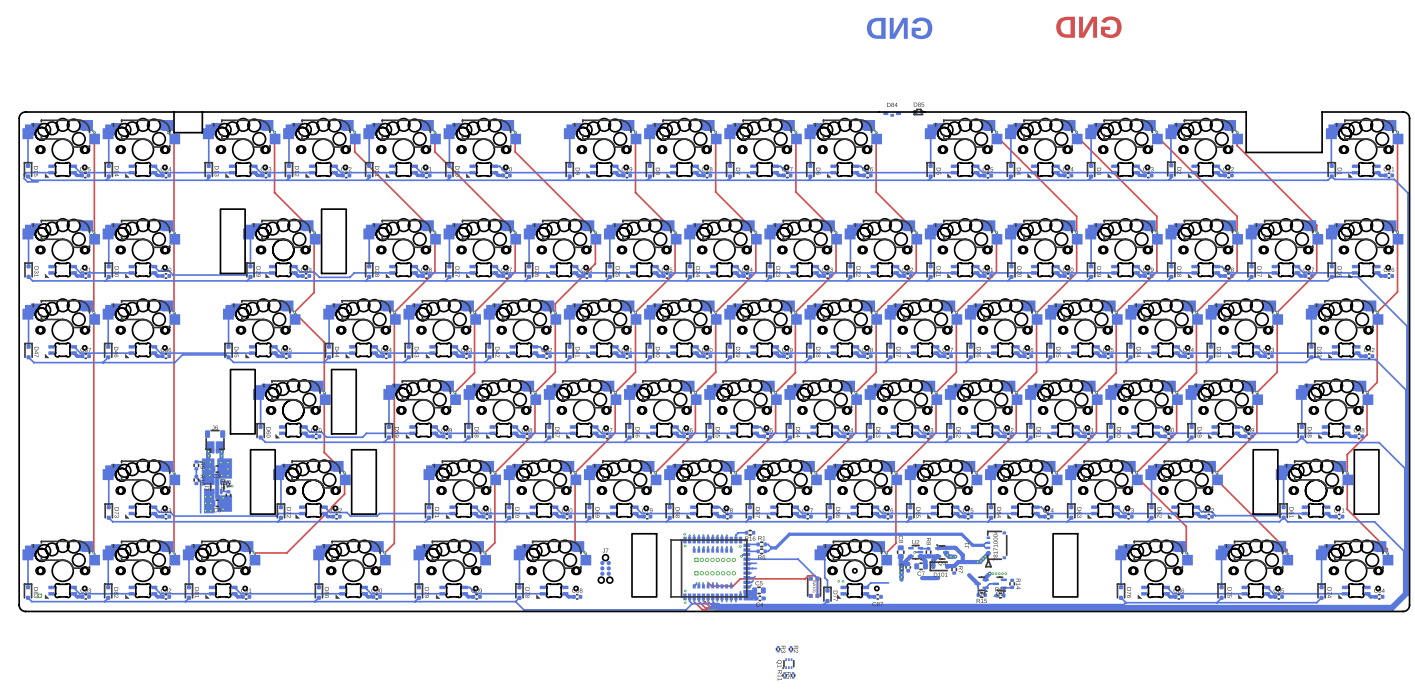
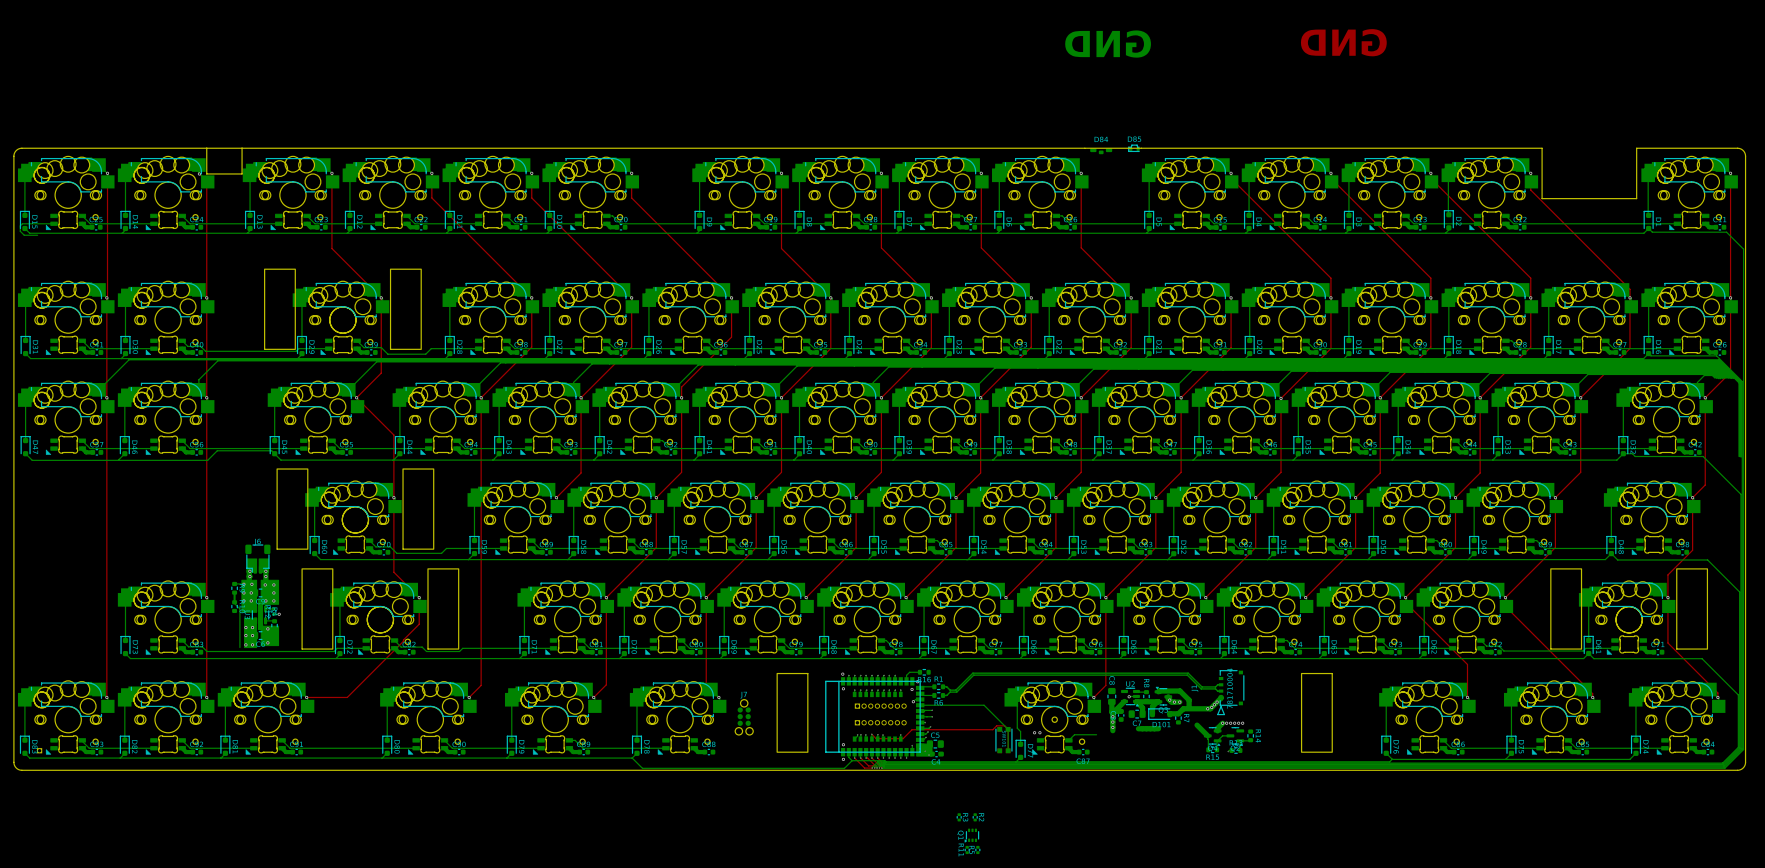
bottom track: (1331, 276) (1357, 276) (1406, 326) -> (1648, 353) (1650, 355) (1716, 355) (1742, 381) (1742, 414)
bottom track: none -> (1715, 378) (1712, 375) (1704, 375) (1697, 382) (1697, 389)
bottom track: none -> (1716, 378) (1712, 374) (1587, 374) (1572, 389)
bottom track: none -> (1721, 378) (1714, 371) (1291, 371) (1272, 389)
bottom track: none -> (1722, 378) (1714, 370) (1192, 370) (1172, 389)
bottom track: none -> (1723, 378) (1714, 369) (1093, 369) (1073, 389)
bottom track: none -> (1725, 378) (1715, 368) (994, 368) (973, 389)
bottom track: none -> (1726, 378) (1715, 367) (888, 367) (873, 382) (873, 389)
bottom track: none -> (1728, 378) (1716, 366) (797, 366) (773, 389)
bottom track: none -> (1730, 378) (1716, 365) (698, 365) (673, 389)
bottom track: none -> (1731, 378) (1717, 363) (592, 363) (573, 382) (573, 389)
bottom track: none -> (1733, 378) (1717, 362) (500, 362) (473, 389)
bottom track: none -> (1718, 378) (1713, 373) (1489, 373) (1472, 389)
bottom track: none -> (1720, 378) (1713, 372) (1390, 372) (1372, 389)
bottom track: none -> (99, 389) (129, 359) (1718, 359) (1741, 381) (1741, 457)
bottom track: none -> (198, 389) (198, 379) (217, 360) (1718, 360) (1740, 382) (1740, 456)
bottom track: none -> (348, 389) (376, 361) (1718, 361) (1739, 382) (1739, 456)

